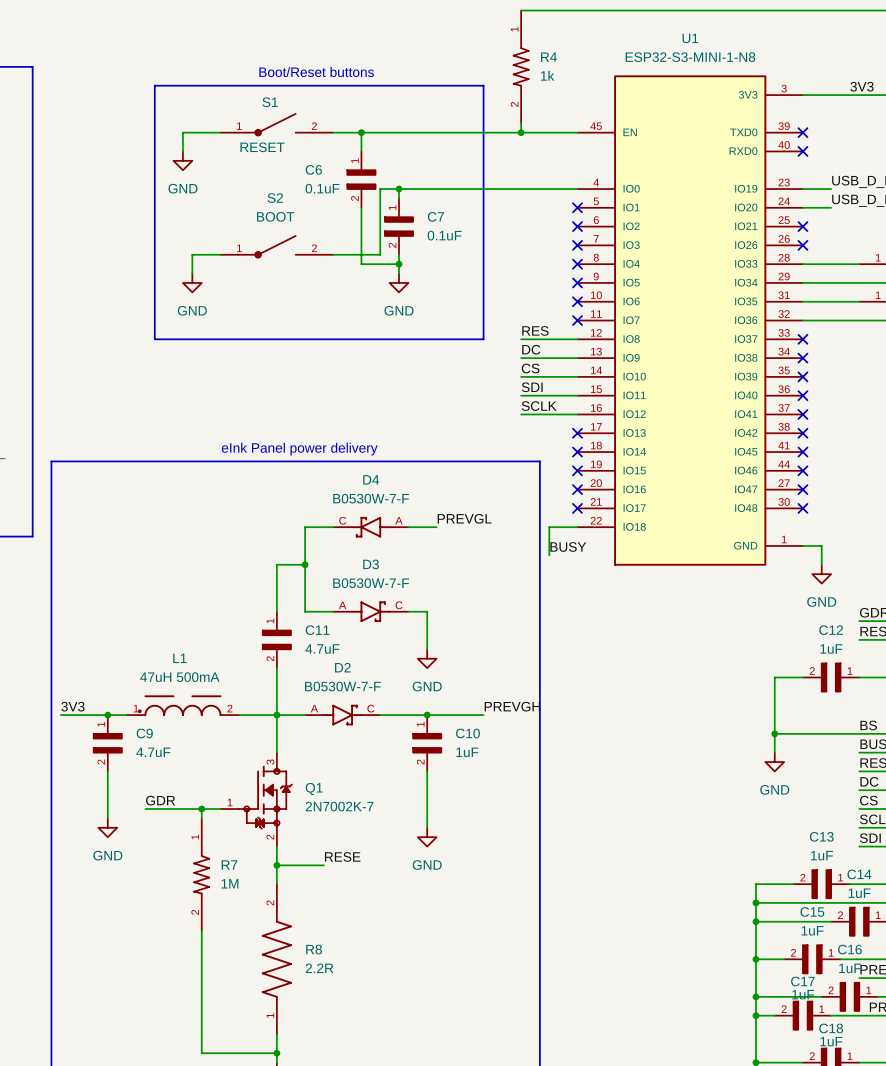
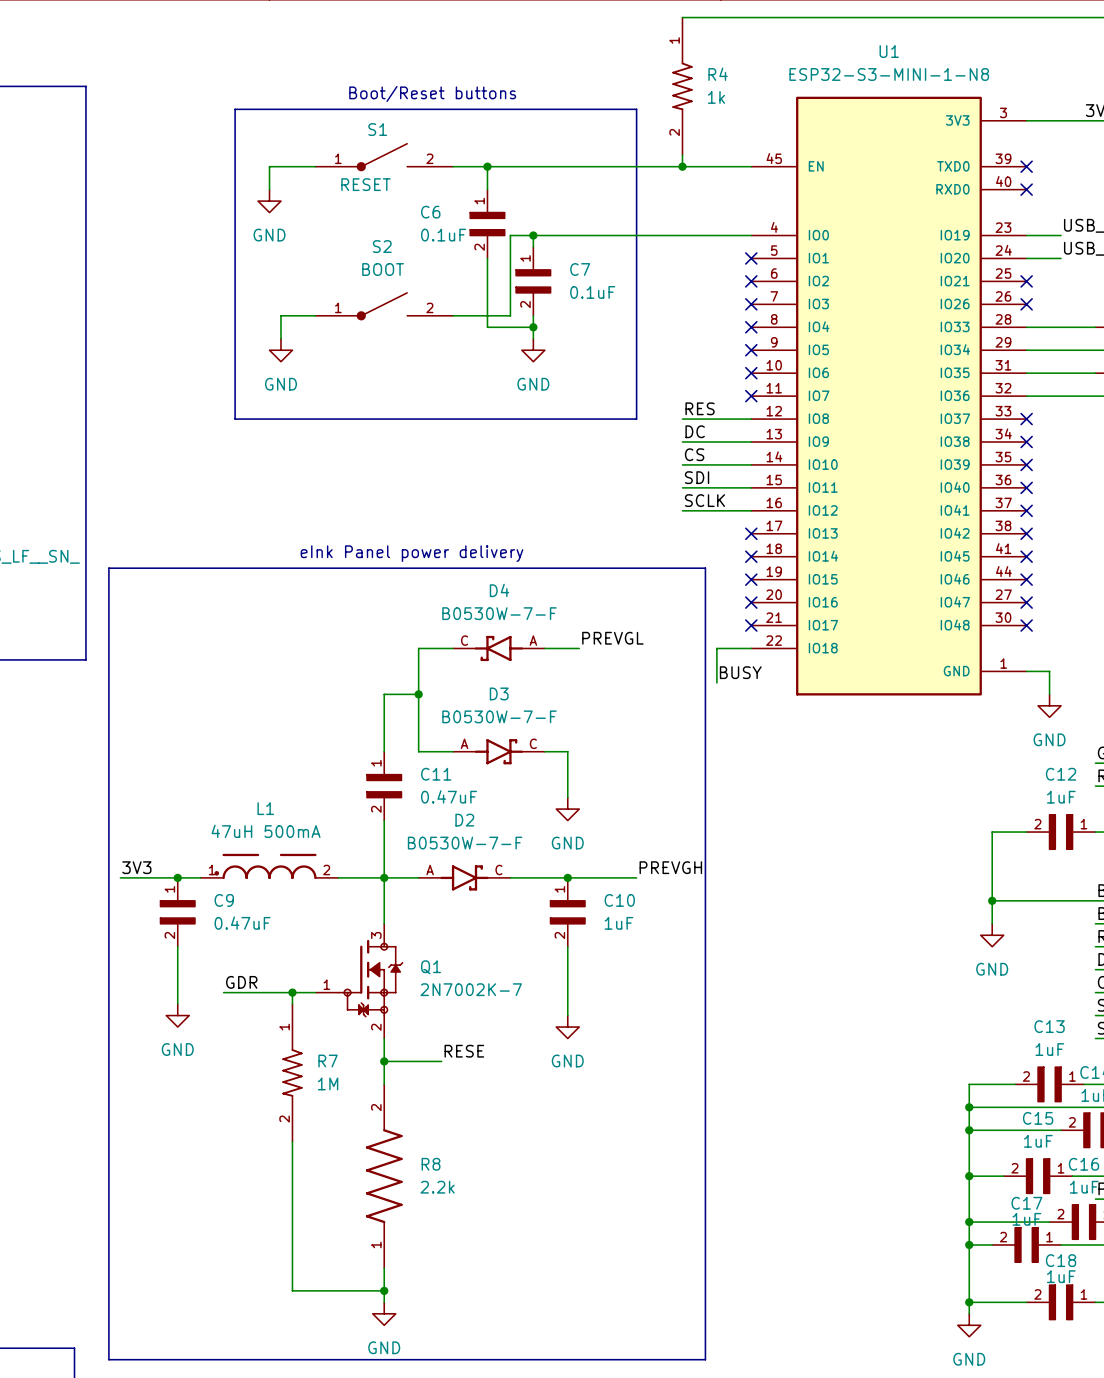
C11 value: 4.7uF (322, 649) -> 0.47uF (449, 796)
C9 value: 4.7uF (153, 752) -> 0.47uF (242, 923)
R8 value: 2.2R (319, 968) -> 2.2k (437, 1187)

